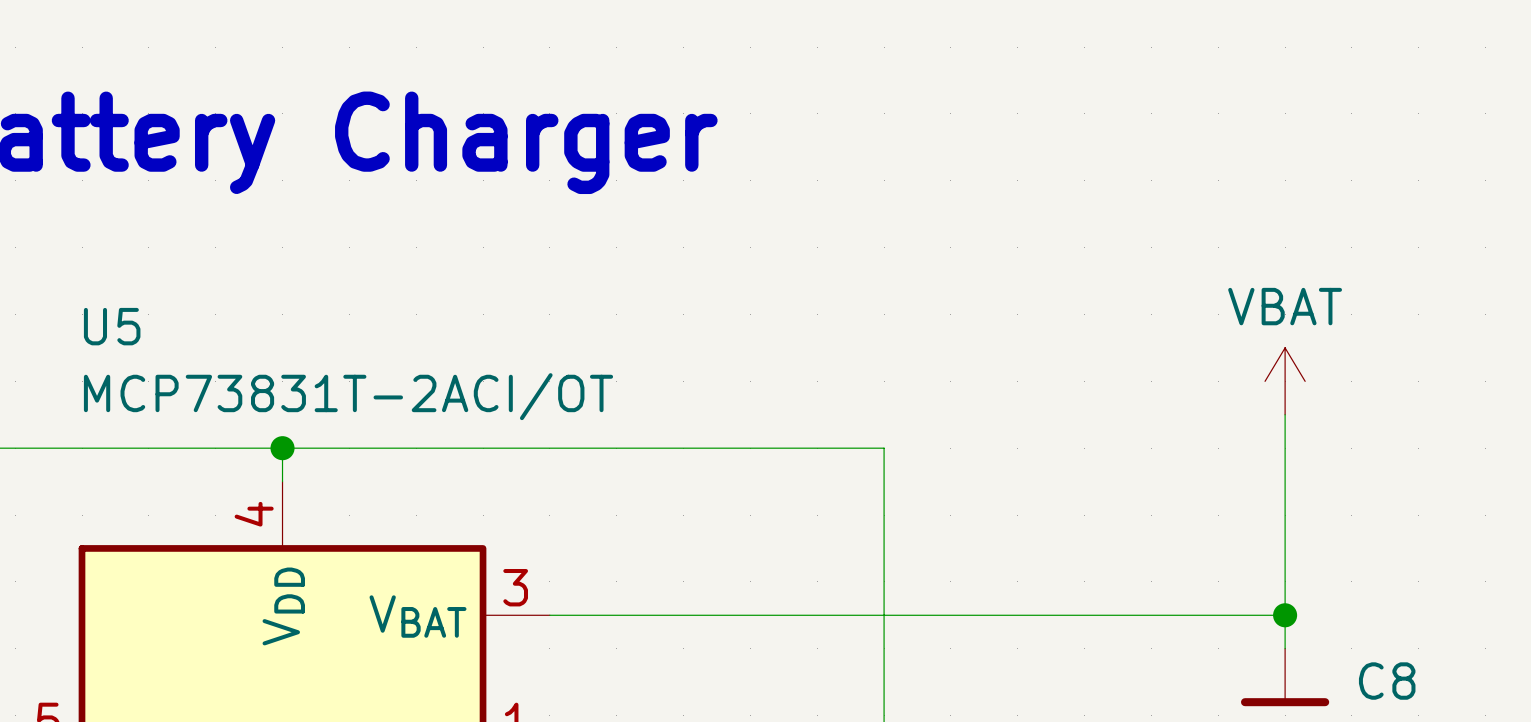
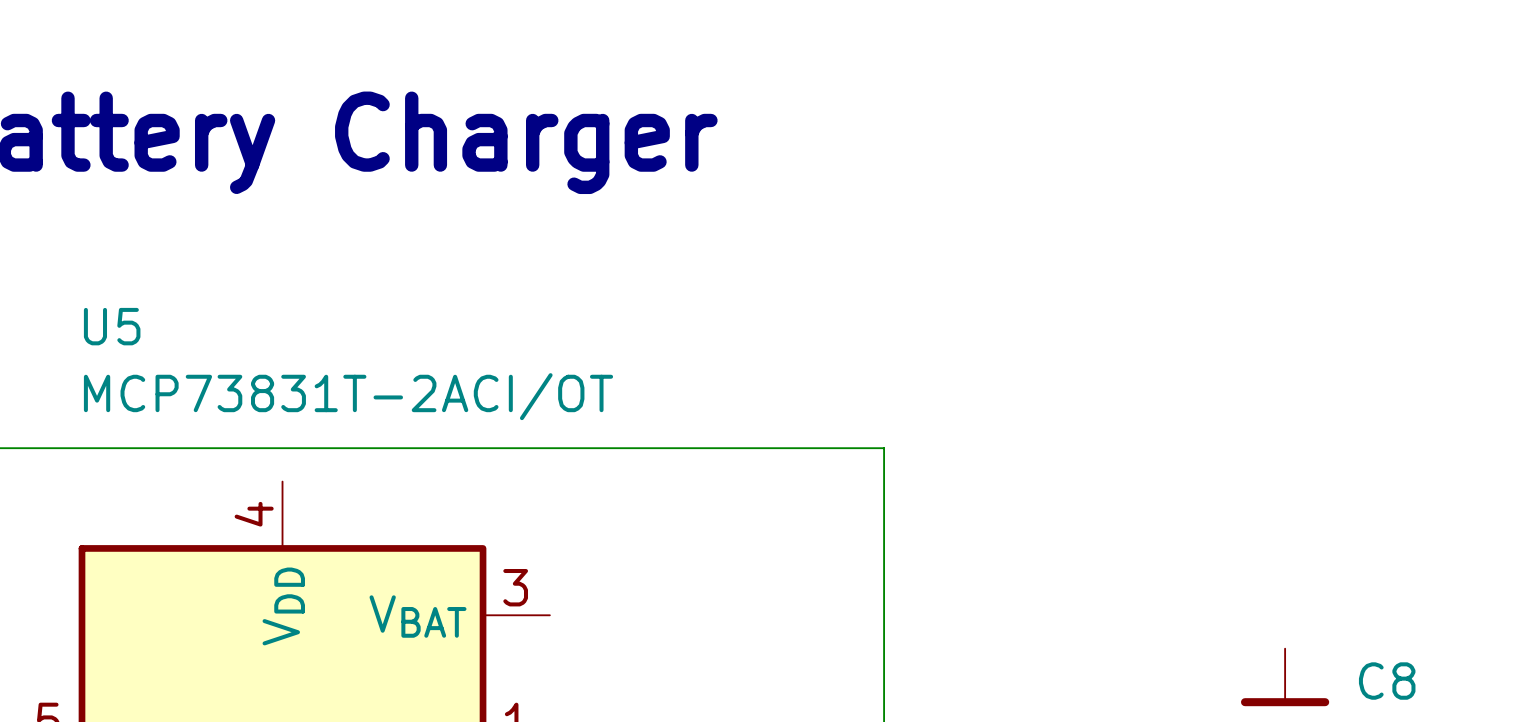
power symbol: VBAT (1285, 381) -> none
wire: (1285, 414) (1285, 648) -> none
wire: (282, 448) (282, 481) -> none
junction: (282, 448) -> none
wire: (549, 615) (1285, 615) -> none
junction: (1285, 615) -> none

